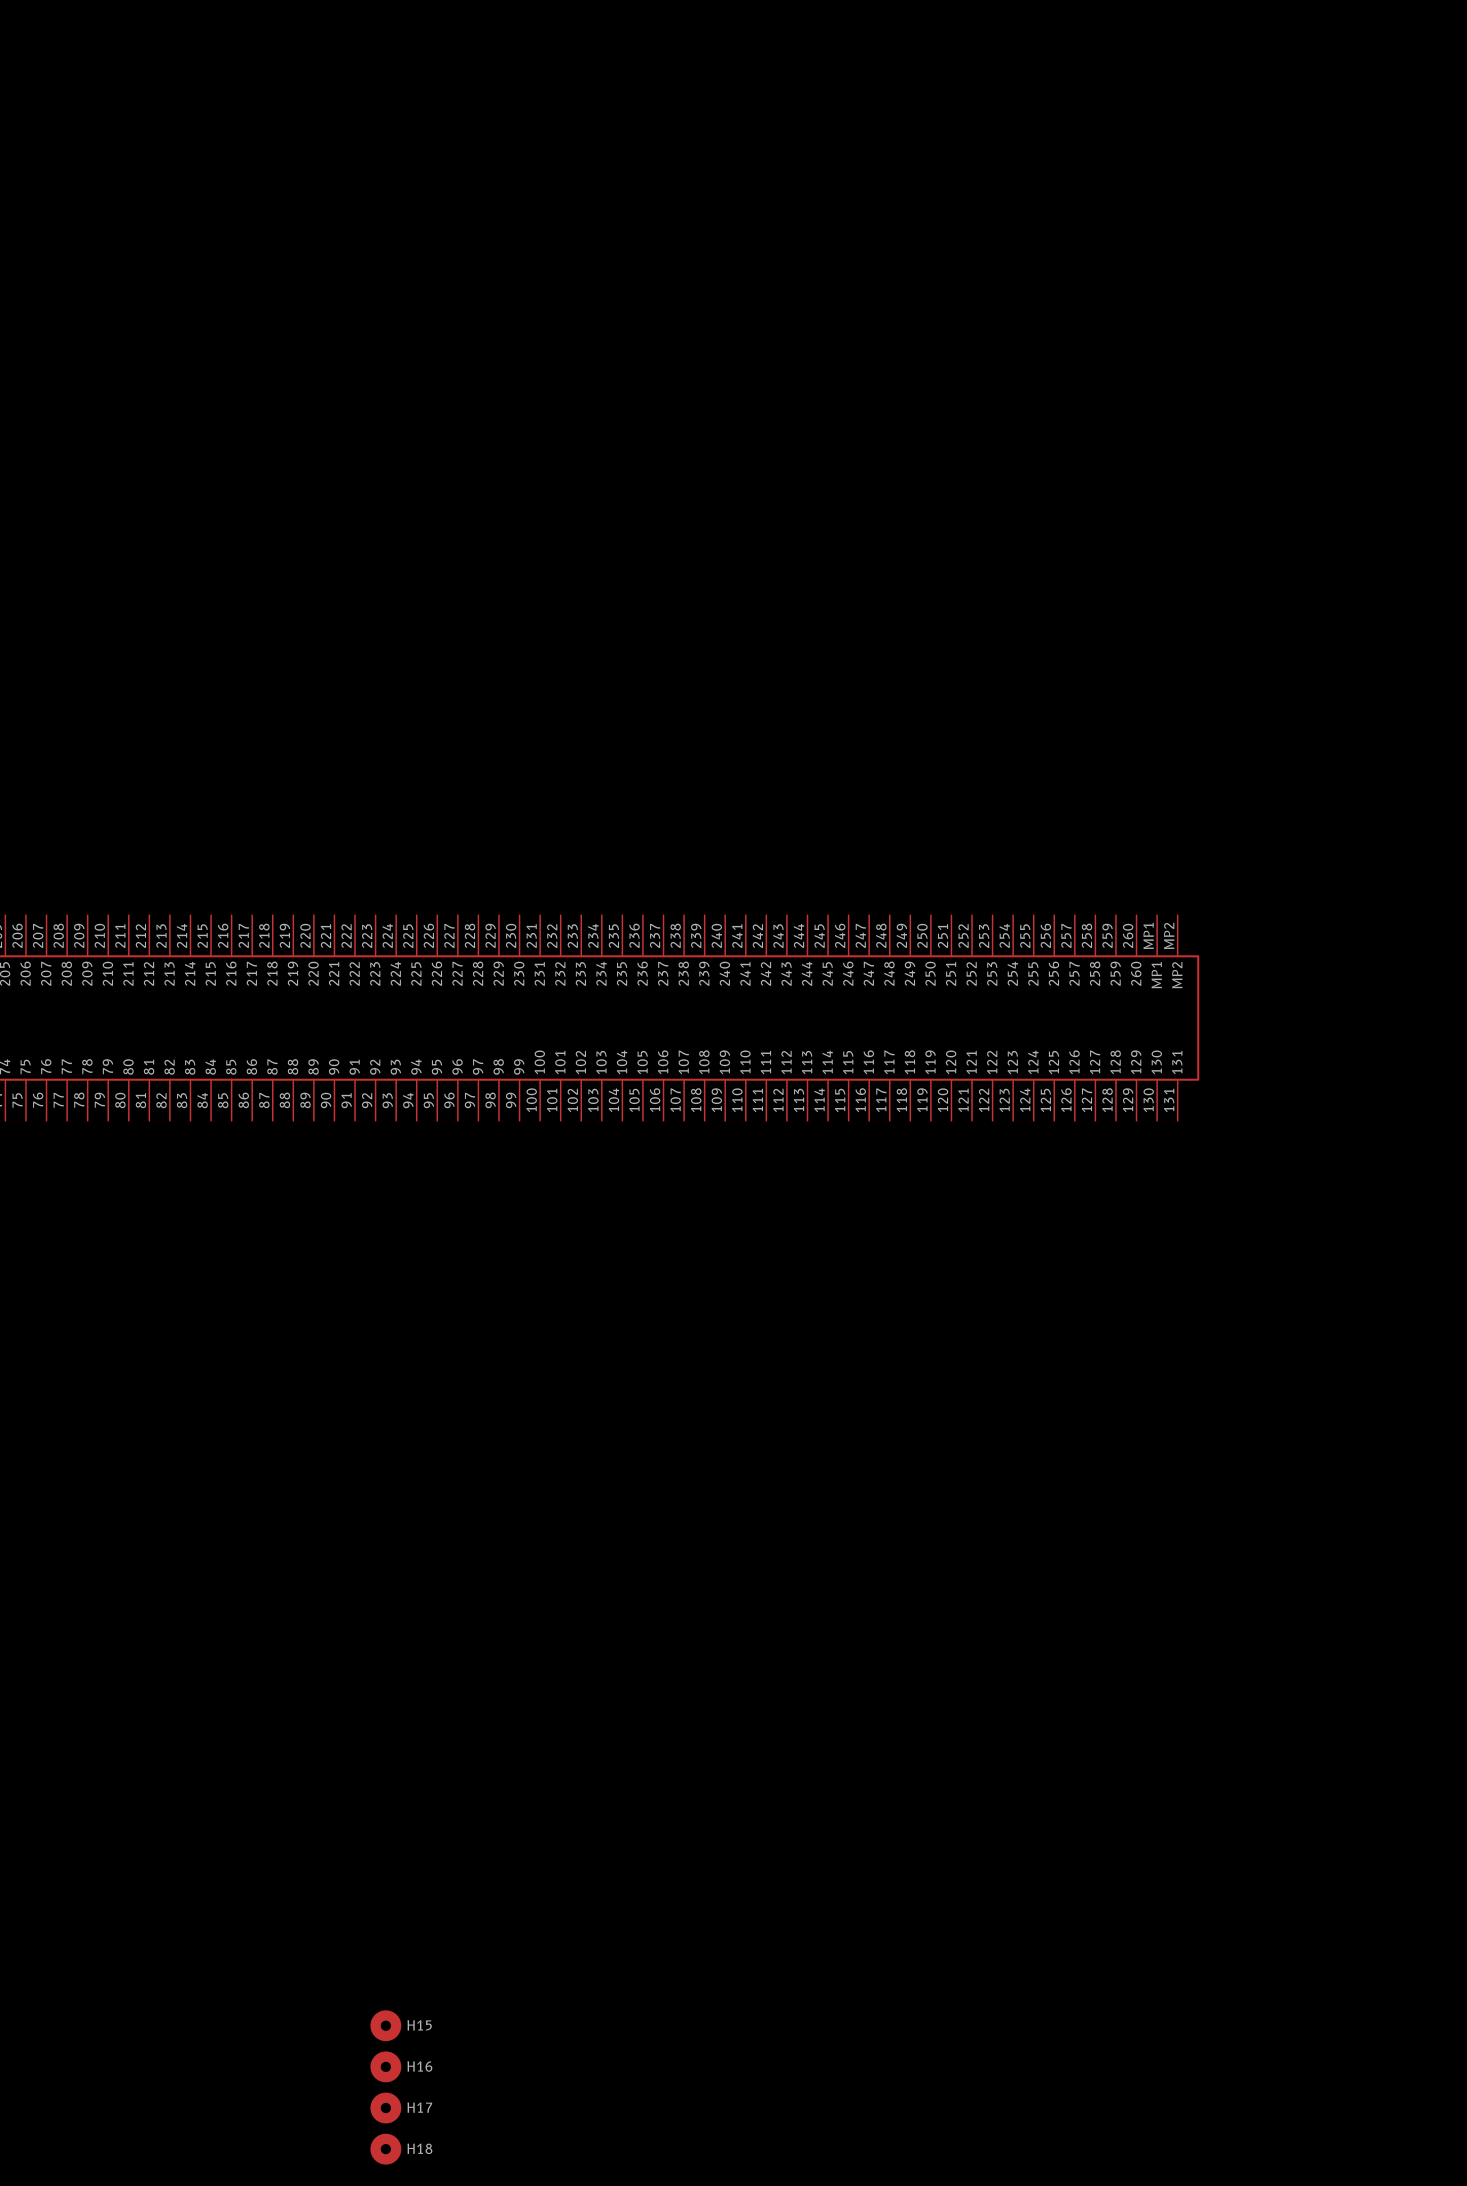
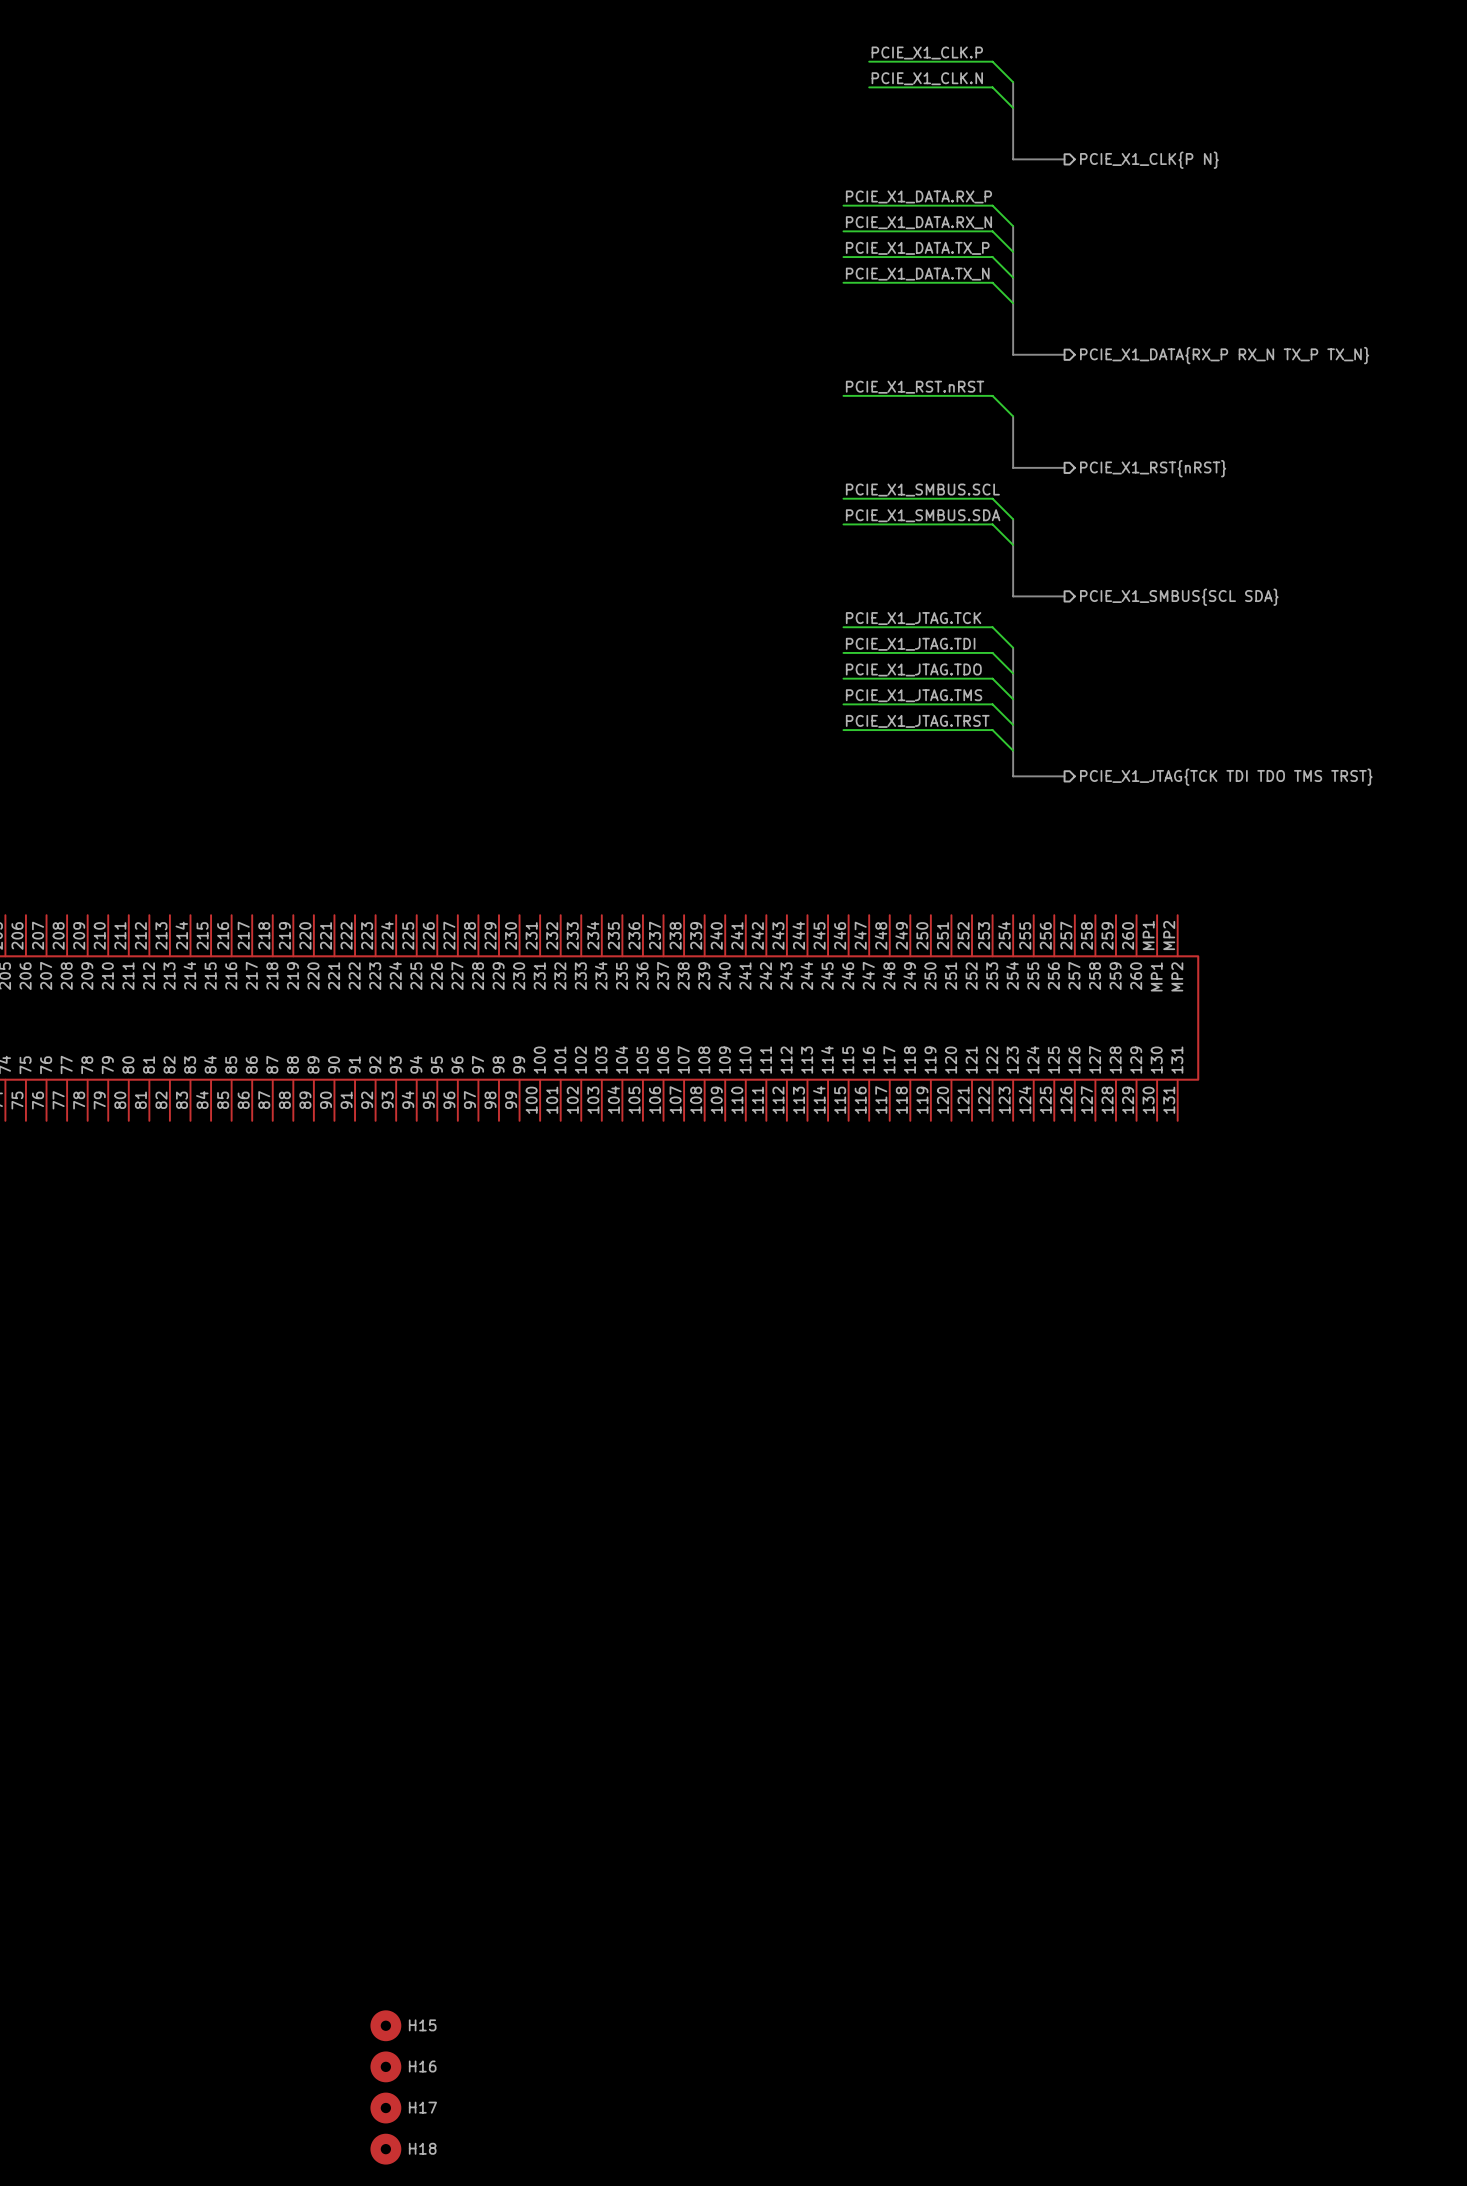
label: none -> PCIE_X1_CLK.P (927, 52)
wire: none -> (869, 61) (992, 61) (1013, 82)
label: none -> PCIE_X1_CLK.N (927, 78)
bus: none -> (1013, 82) (1013, 159) (1064, 159)
wire: none -> (869, 87) (992, 87)
wire: none -> (992, 87) (1013, 107)
hierarchical label: none -> PCIE_X1_CLK{P N} (1149, 160)
label: none -> PCIE_X1_DATA.RX_P (918, 196)
wire: none -> (843, 205) (992, 205) (1013, 226)
label: none -> PCIE_X1_DATA.RX_N (918, 222)
bus: none -> (1013, 226) (1013, 354) (1064, 354)
wire: none -> (843, 231) (992, 231) (1013, 251)
label: none -> PCIE_X1_DATA.TX_P (917, 248)
wire: none -> (843, 257) (992, 257) (1013, 277)
label: none -> PCIE_X1_DATA.TX_N (917, 274)
wire: none -> (843, 282) (992, 282) (1013, 303)
hierarchical label: none -> PCIE_X1_DATA{RX_P RX_N TX_P TX_N} (1224, 355)
label: none -> PCIE_X1_RST.nRST (915, 387)
wire: none -> (843, 395) (992, 395) (1013, 416)
bus: none -> (1013, 416) (1013, 467) (1064, 467)
hierarchical label: none -> PCIE_X1_RST{nRST} (1153, 468)
label: none -> PCIE_X1_SMBUS.SCL (922, 490)
wire: none -> (843, 498) (992, 498) (1013, 519)
label: none -> PCIE_X1_SMBUS.SDA (923, 515)
bus: none -> (1013, 519) (1013, 596) (1064, 596)
wire: none -> (843, 524) (992, 524) (1013, 544)
hierarchical label: none -> PCIE_X1_SMBUS{SCL SDA} (1179, 597)
label: none -> PCIE_X1_JTAG.TCK (913, 618)
wire: none -> (843, 627) (992, 627) (1013, 647)
label: none -> PCIE_X1_JTAG.TDI (910, 644)
bus: none -> (1013, 647) (1013, 776) (1064, 776)
wire: none -> (843, 652) (992, 652)
wire: none -> (992, 652) (1013, 673)
label: none -> PCIE_X1_JTAG.TDO (913, 669)
wire: none -> (843, 678) (992, 678) (1013, 699)
label: none -> PCIE_X1_JTAG.TMS (914, 695)
wire: none -> (843, 704) (992, 704)
wire: none -> (992, 704) (1013, 724)
label: none -> PCIE_X1_JTAG.TRST (917, 721)
wire: none -> (843, 730) (992, 730) (1013, 750)
hierarchical label: none -> PCIE_X1_JTAG{TCK TDI TDO TMS TRST} (1226, 777)

